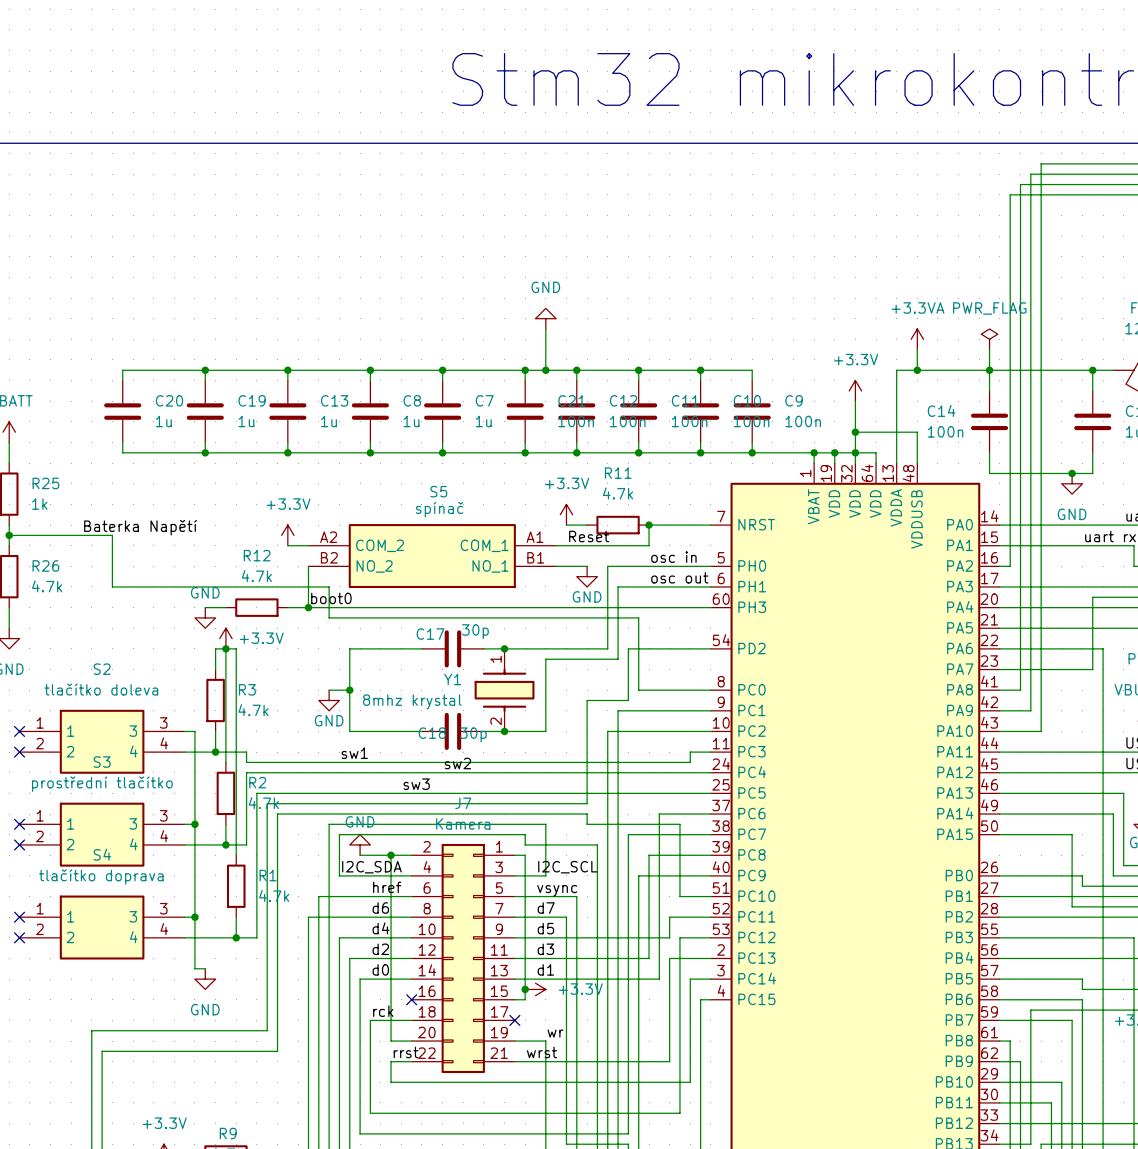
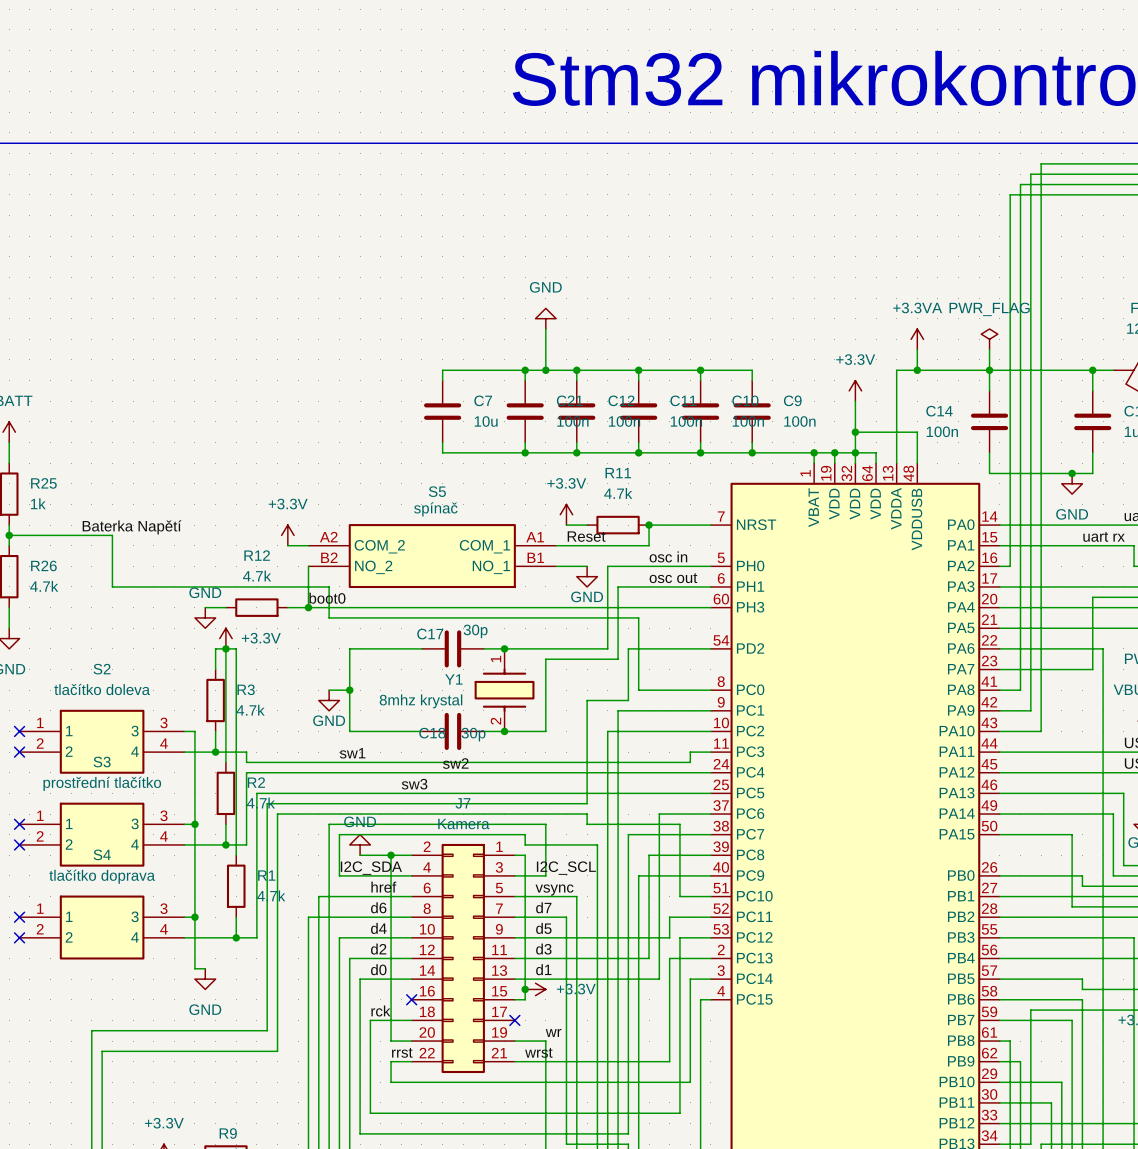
wire: (205, 370) (205, 380) -> none
junction: (205, 370) -> none
wire: (287, 370) (287, 380) -> none
junction: (287, 370) -> none
wire: (370, 370) (370, 380) -> none
junction: (370, 370) -> none
wire: (442, 370) (122, 370) (122, 380) -> none
junction: (442, 370) -> none
C20: 1u (122, 411) -> none
C19: 1u (205, 411) -> none
C13: 1u (287, 411) -> none
C8: 1u (370, 411) -> none
C7 value: 1u (483, 421) -> 10u (486, 421)
wire: (122, 442) (122, 452) (442, 452) -> none
wire: (205, 442) (205, 452) -> none
wire: (287, 442) (287, 452) -> none
wire: (370, 442) (370, 452) -> none
junction: (205, 452) -> none
junction: (287, 452) -> none
junction: (370, 452) -> none
junction: (442, 452) -> none

